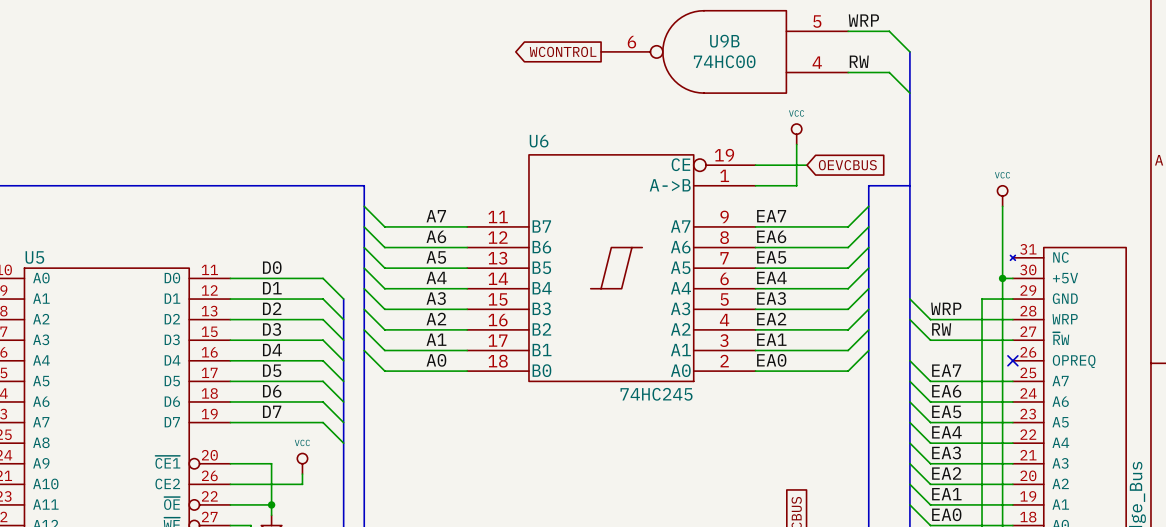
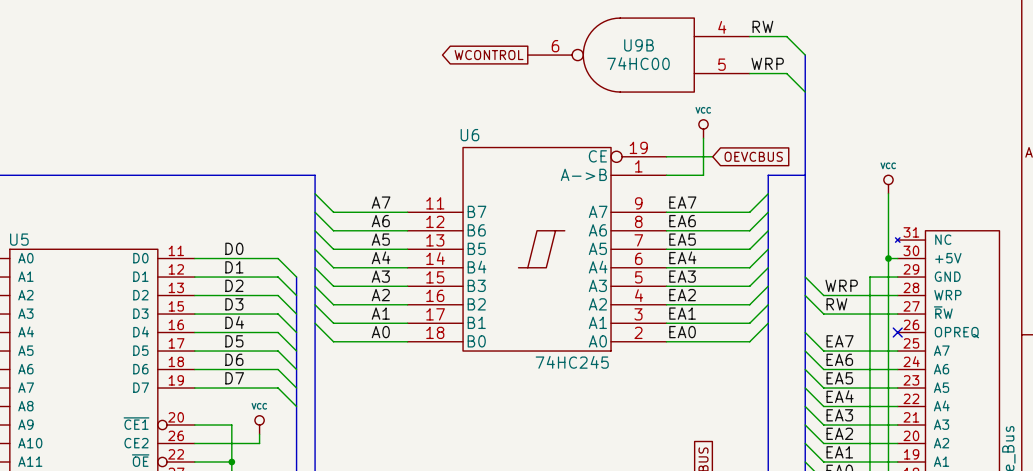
label: WRP (863, 20) -> RW (762, 26)
U9B flip: as is (724, 51) -> up-down (638, 55)
label: RW (859, 61) -> WRP (767, 63)

